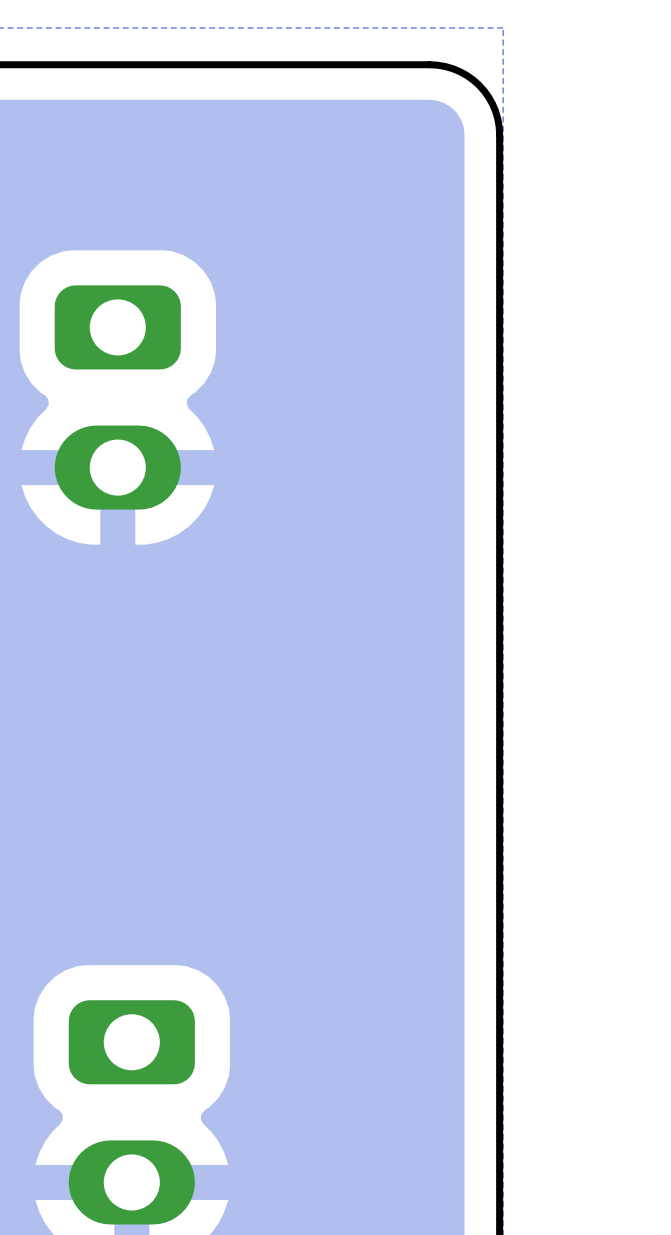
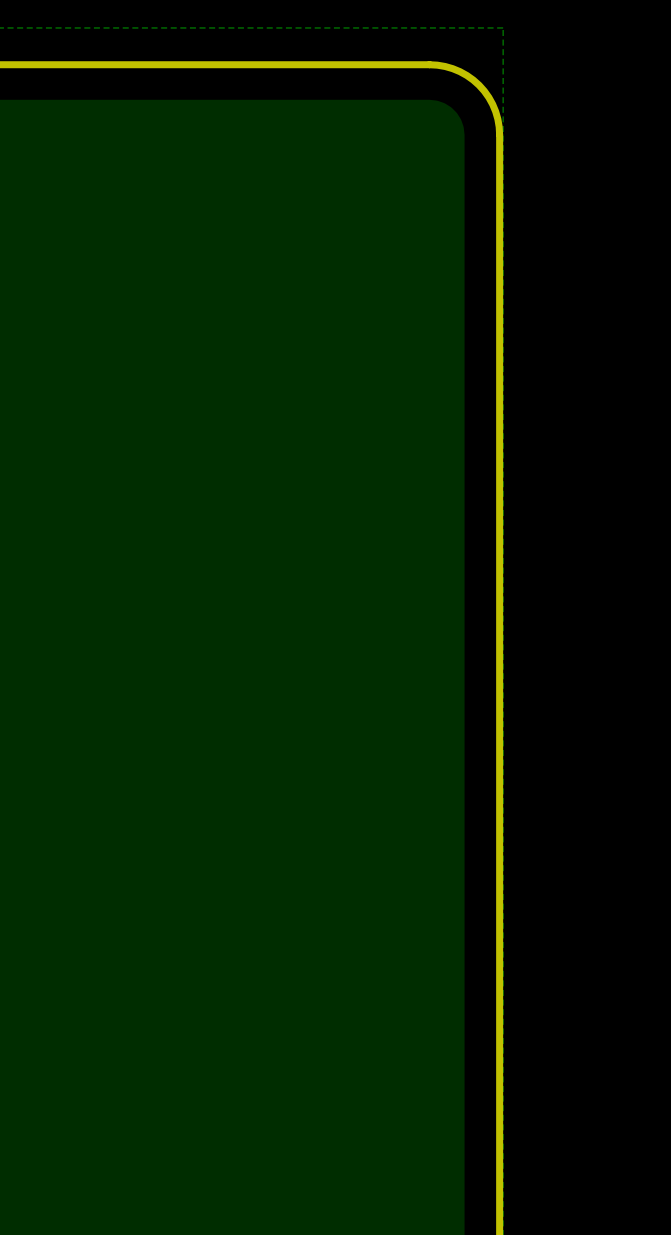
part: (117, 397) -> none
part: (131, 1112) -> none

